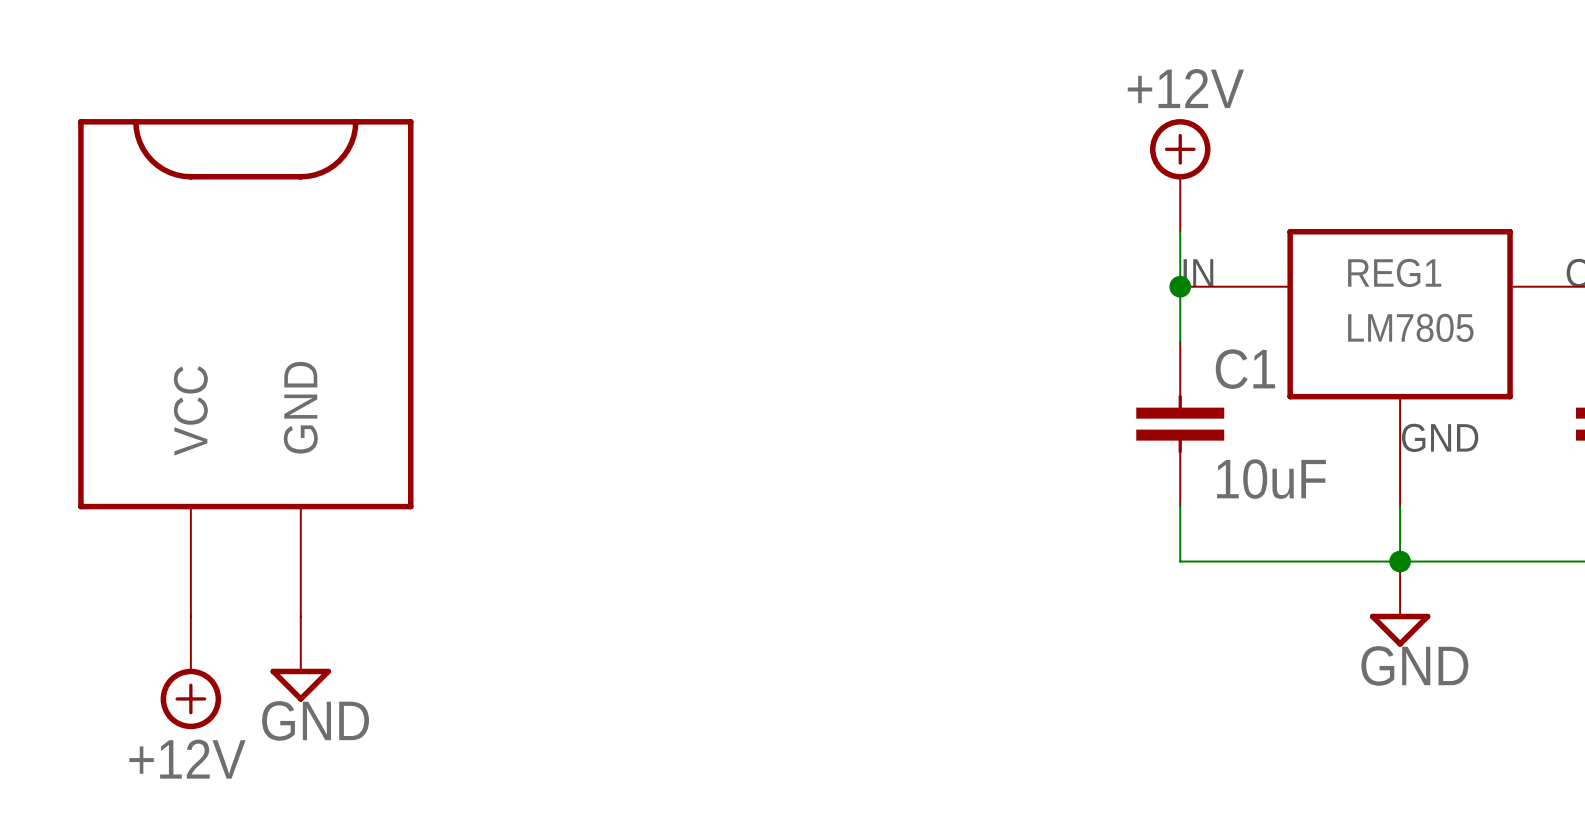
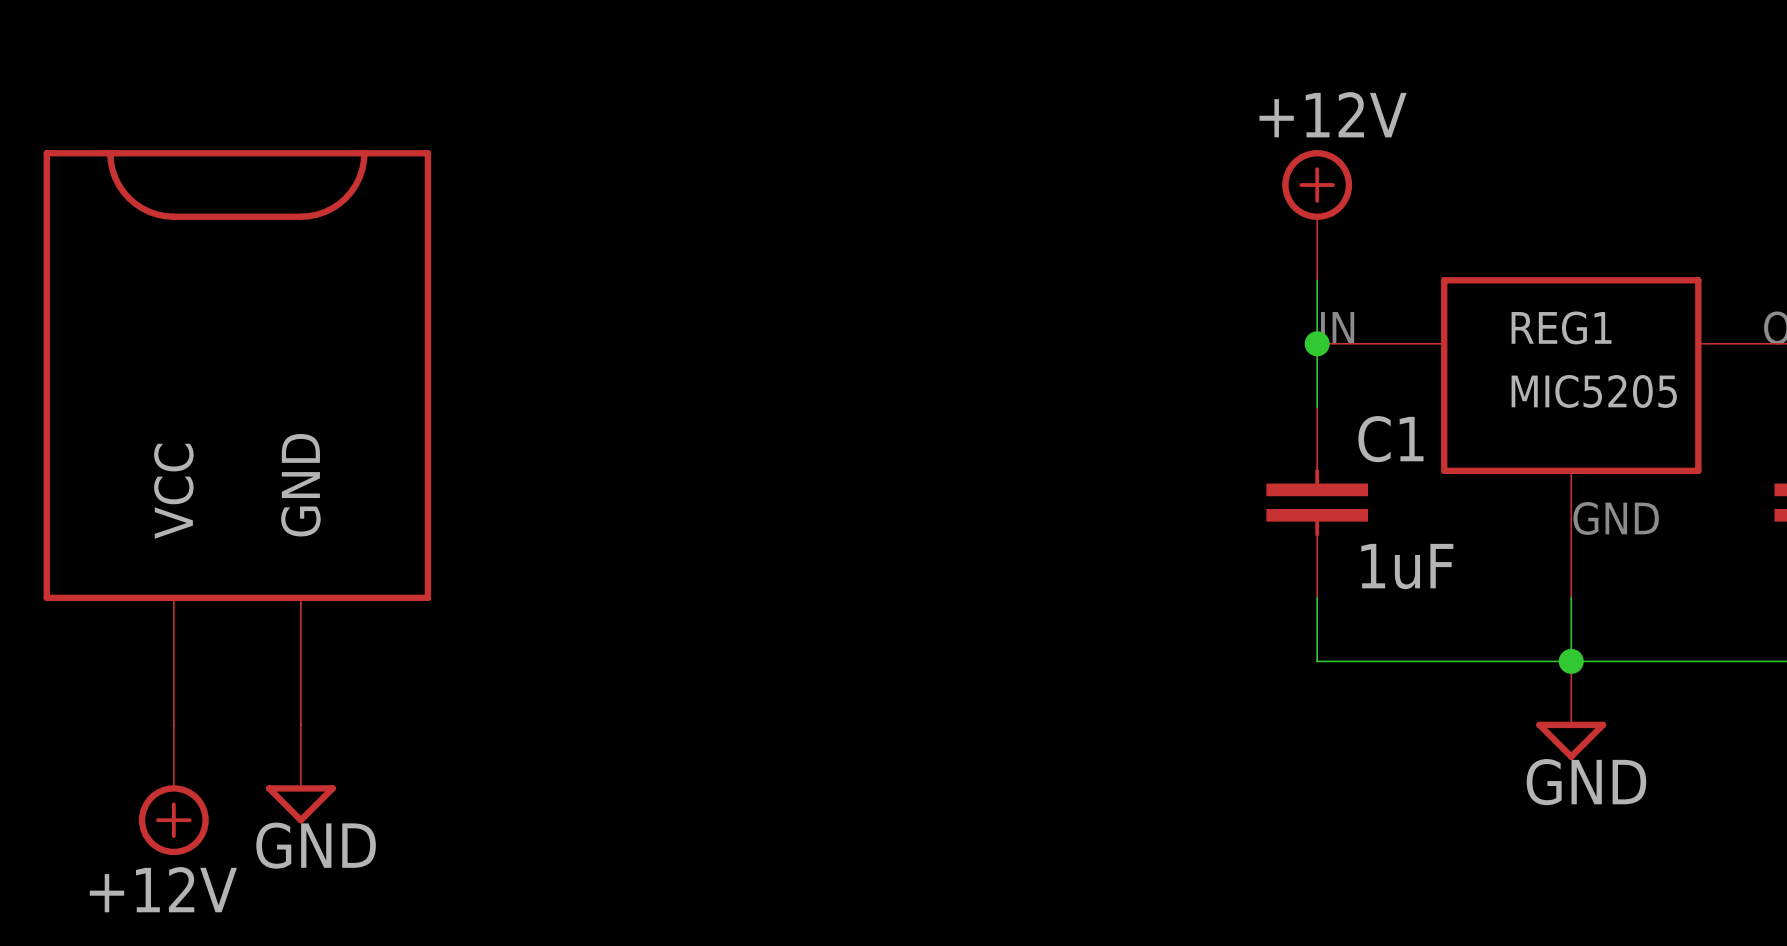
REG1 value: LM7805 (1410, 327) -> MIC5205 (1594, 391)
C1 value: 10uF (1271, 479) -> 1uF (1407, 566)

